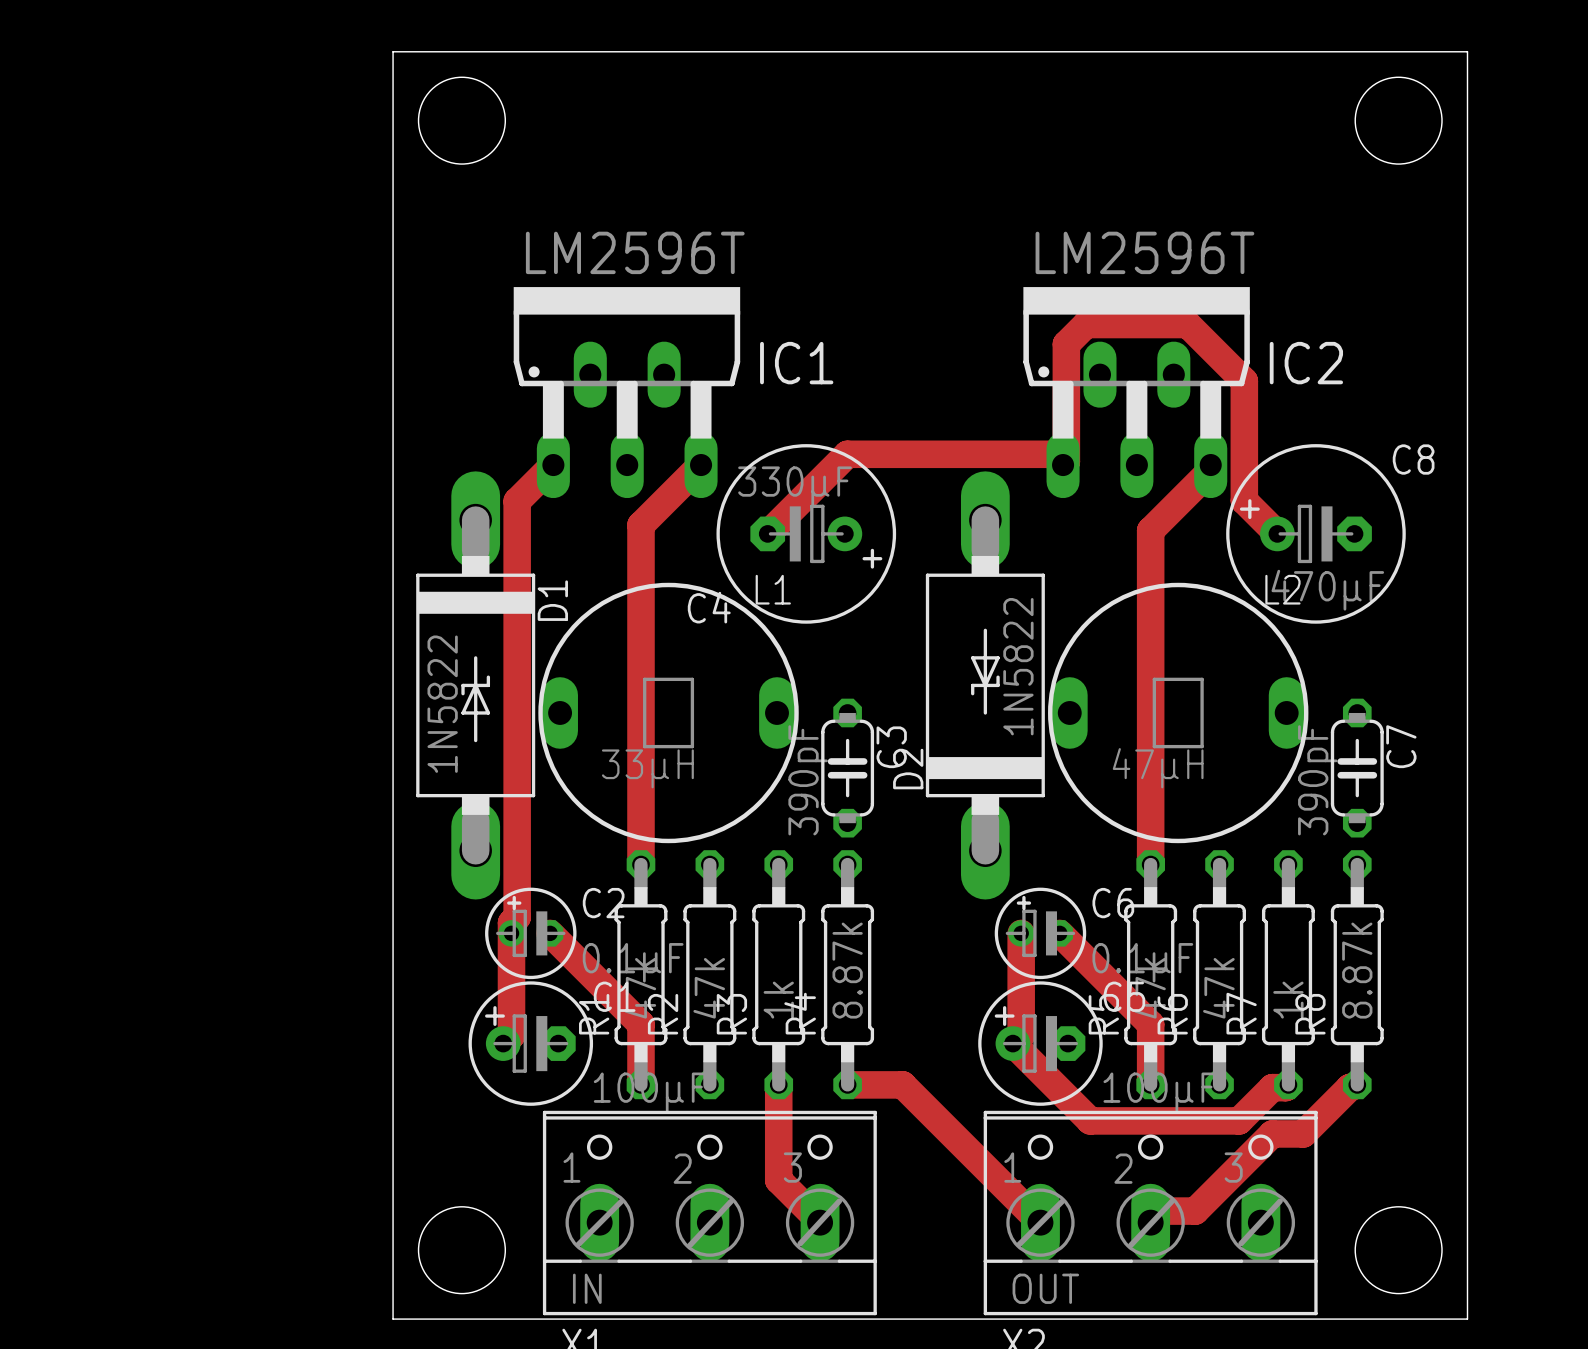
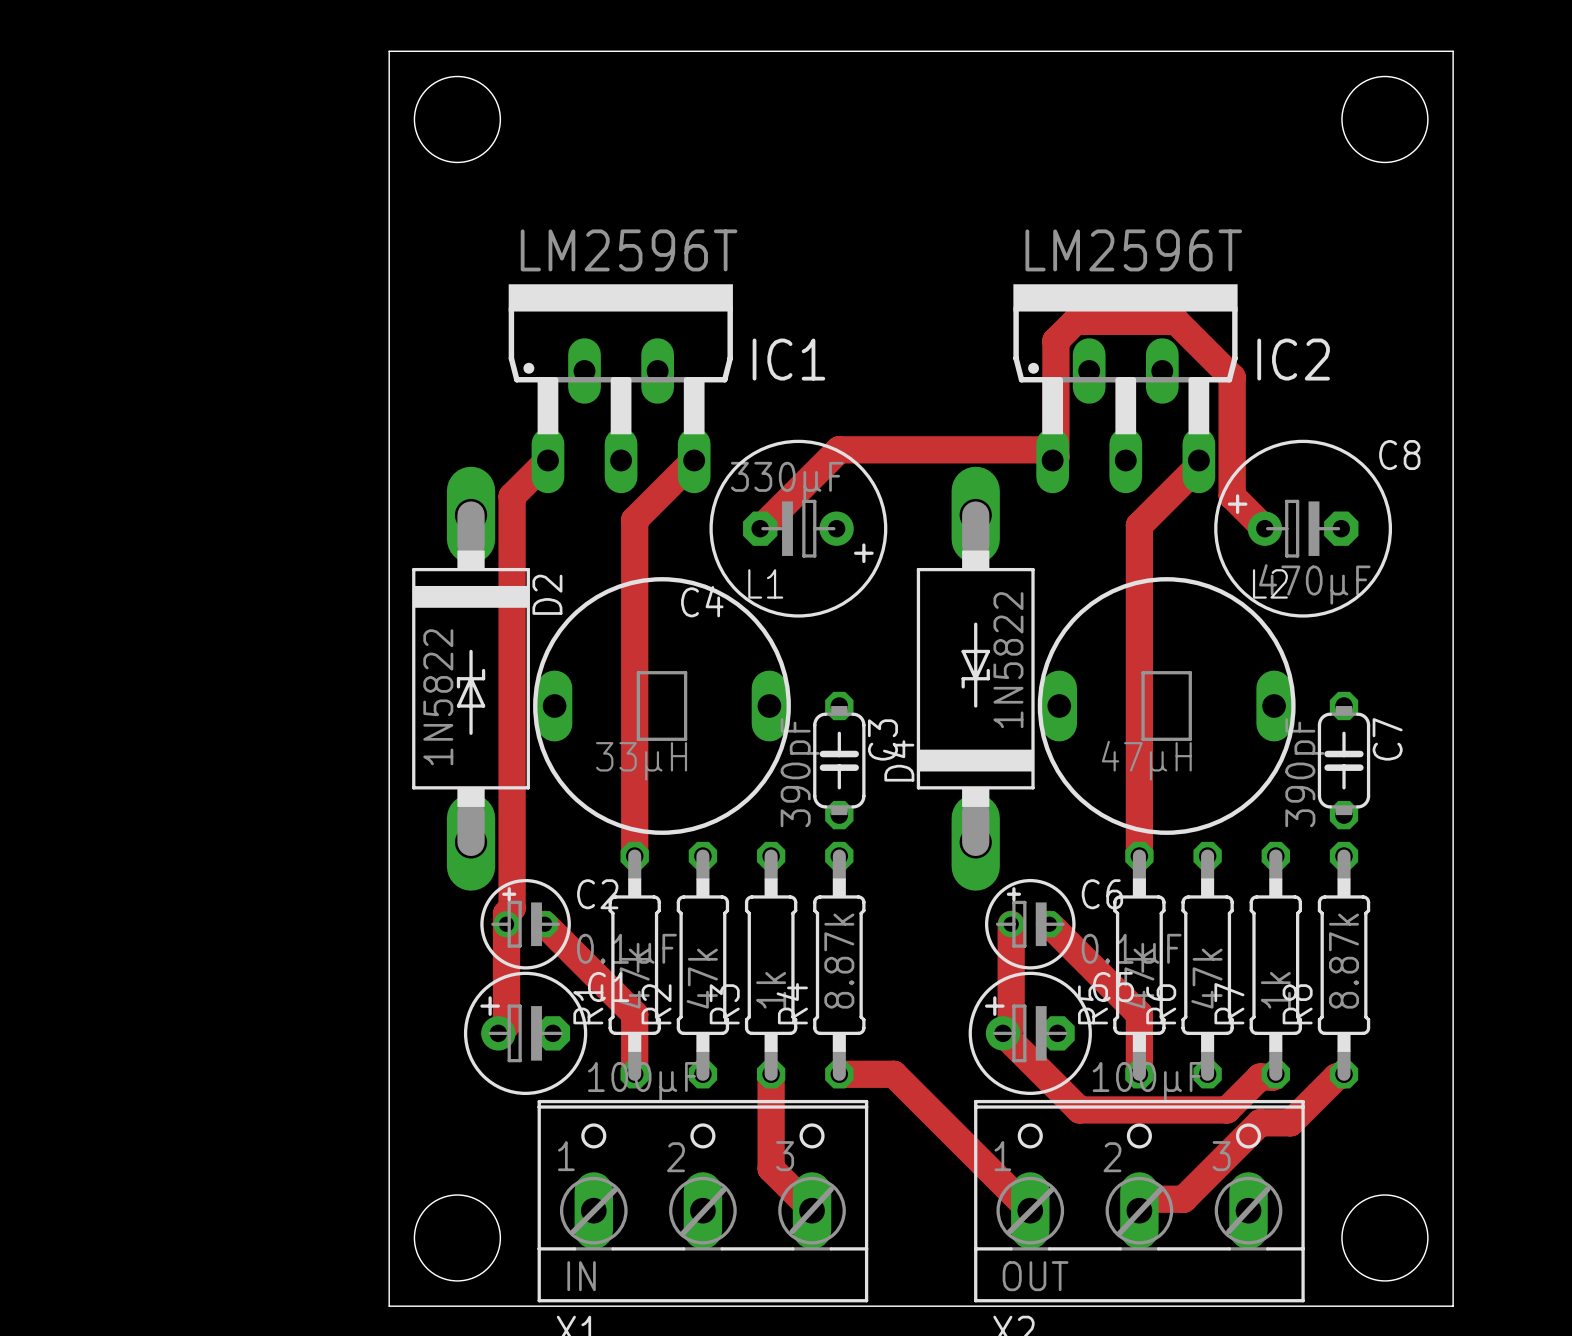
D1 name: D1 (552, 600) -> D2 (547, 594)
D2 name: D2 (908, 769) -> D4 (898, 760)

